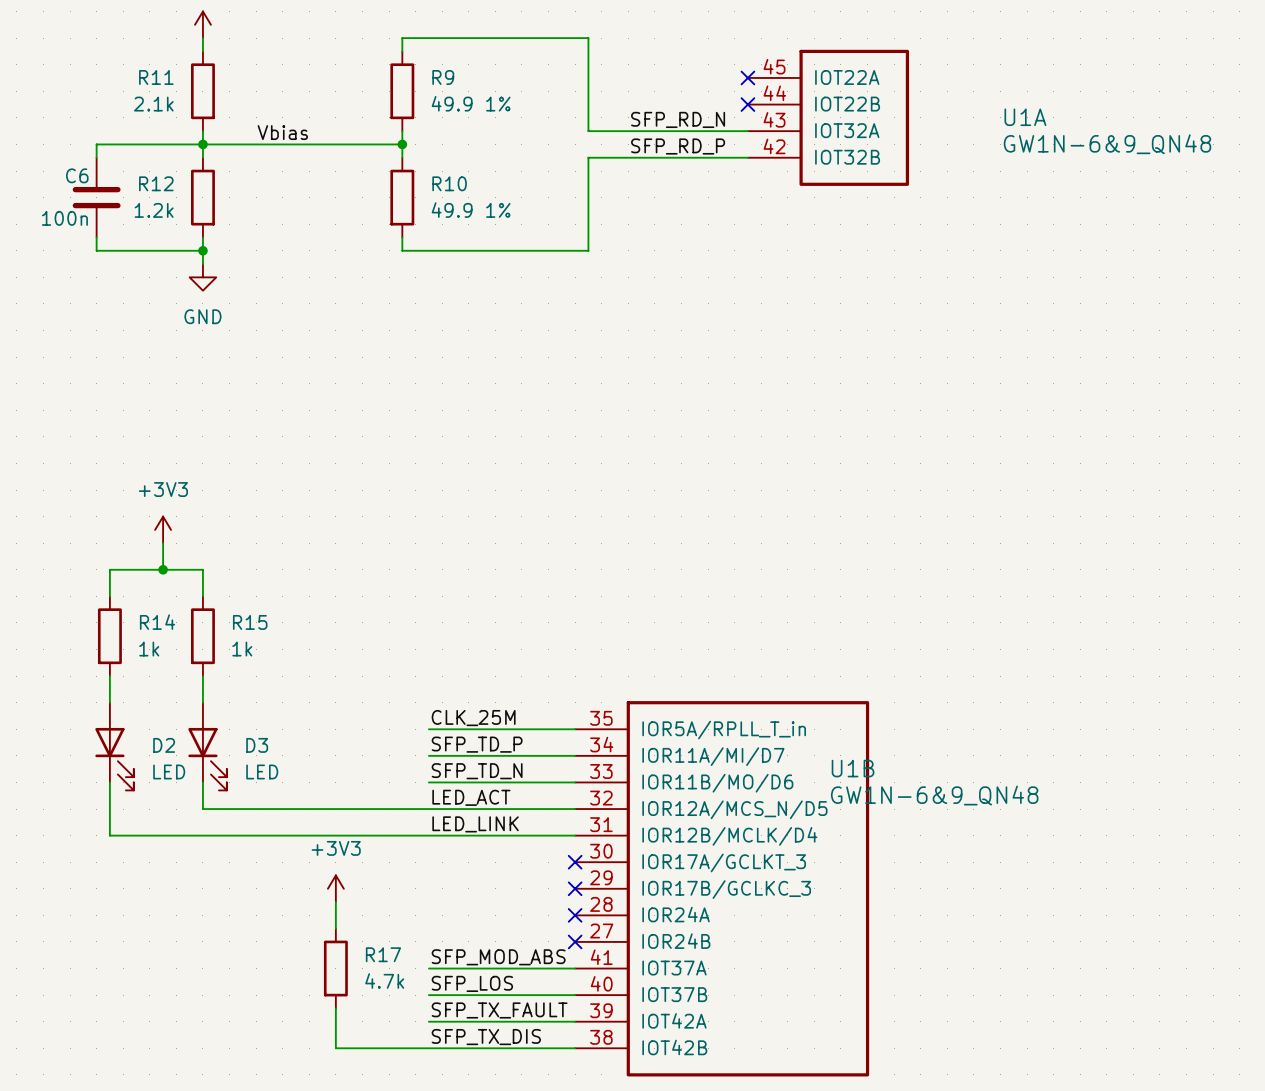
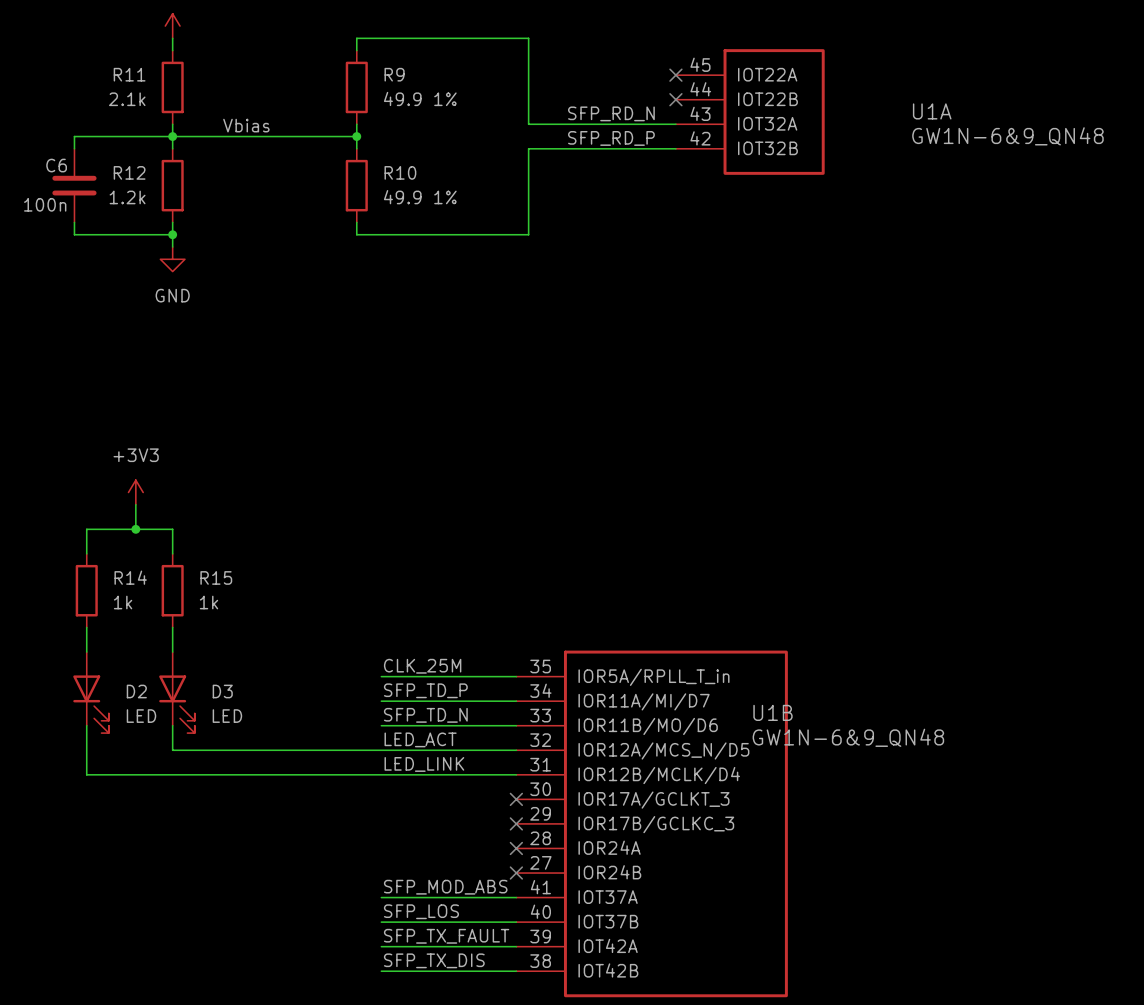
power symbol: +3V3 (335, 888) -> none
wire: (335, 902) (335, 928) -> none
R17: 4.7k (335, 968) -> none
wire: (335, 1008) (335, 1048) (428, 1048) -> none

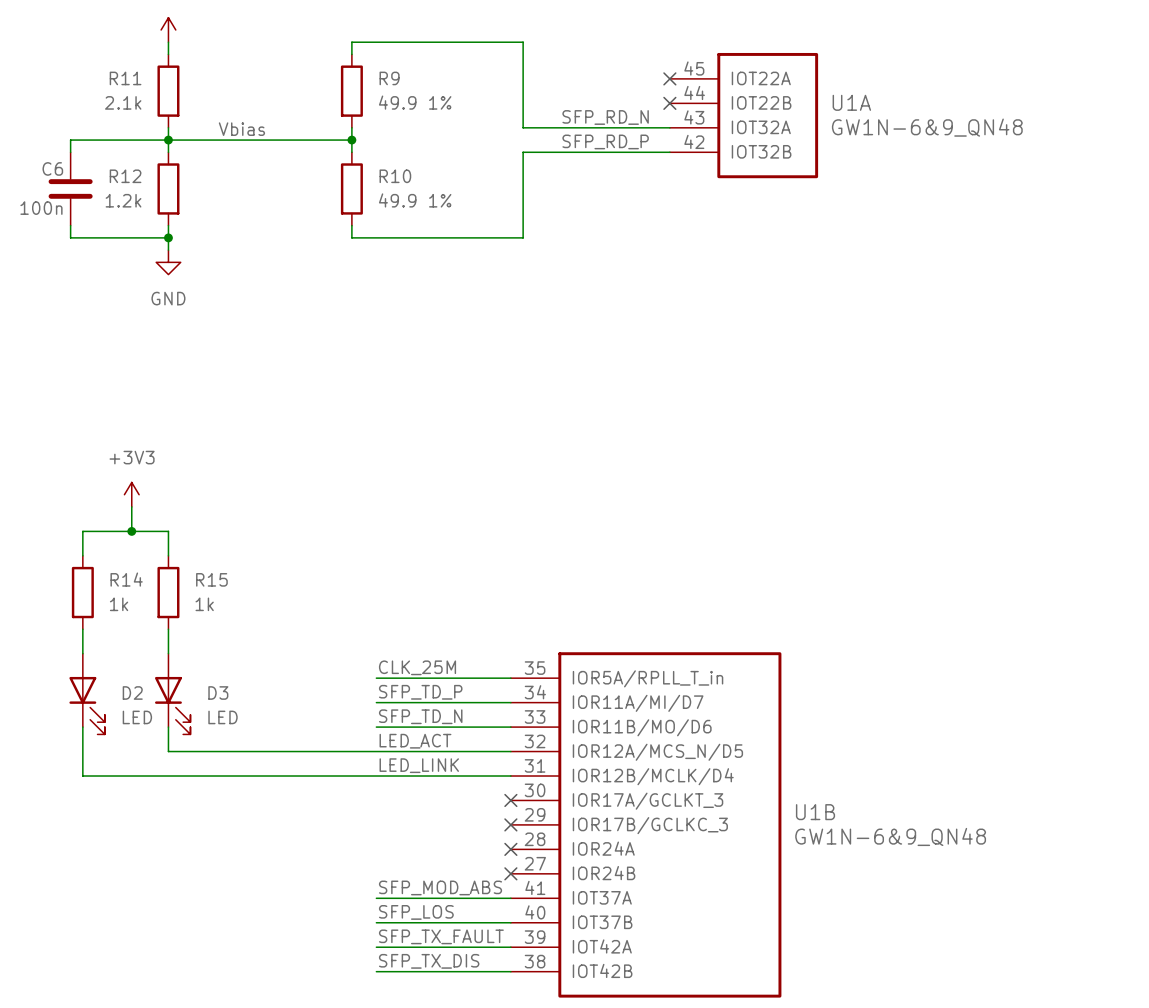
U1A name position: U1A (932, 111) -> U1A (851, 102)
U1A value position: GW1N-6&9_QN48 (1007, 136) -> GW1N-6&9_QN48 (927, 127)
U1B name position: U1B (772, 712) -> U1B (815, 812)
U1B value position: GW1N-6&9_QN48 (848, 737) -> GW1N-6&9_QN48 (890, 836)

